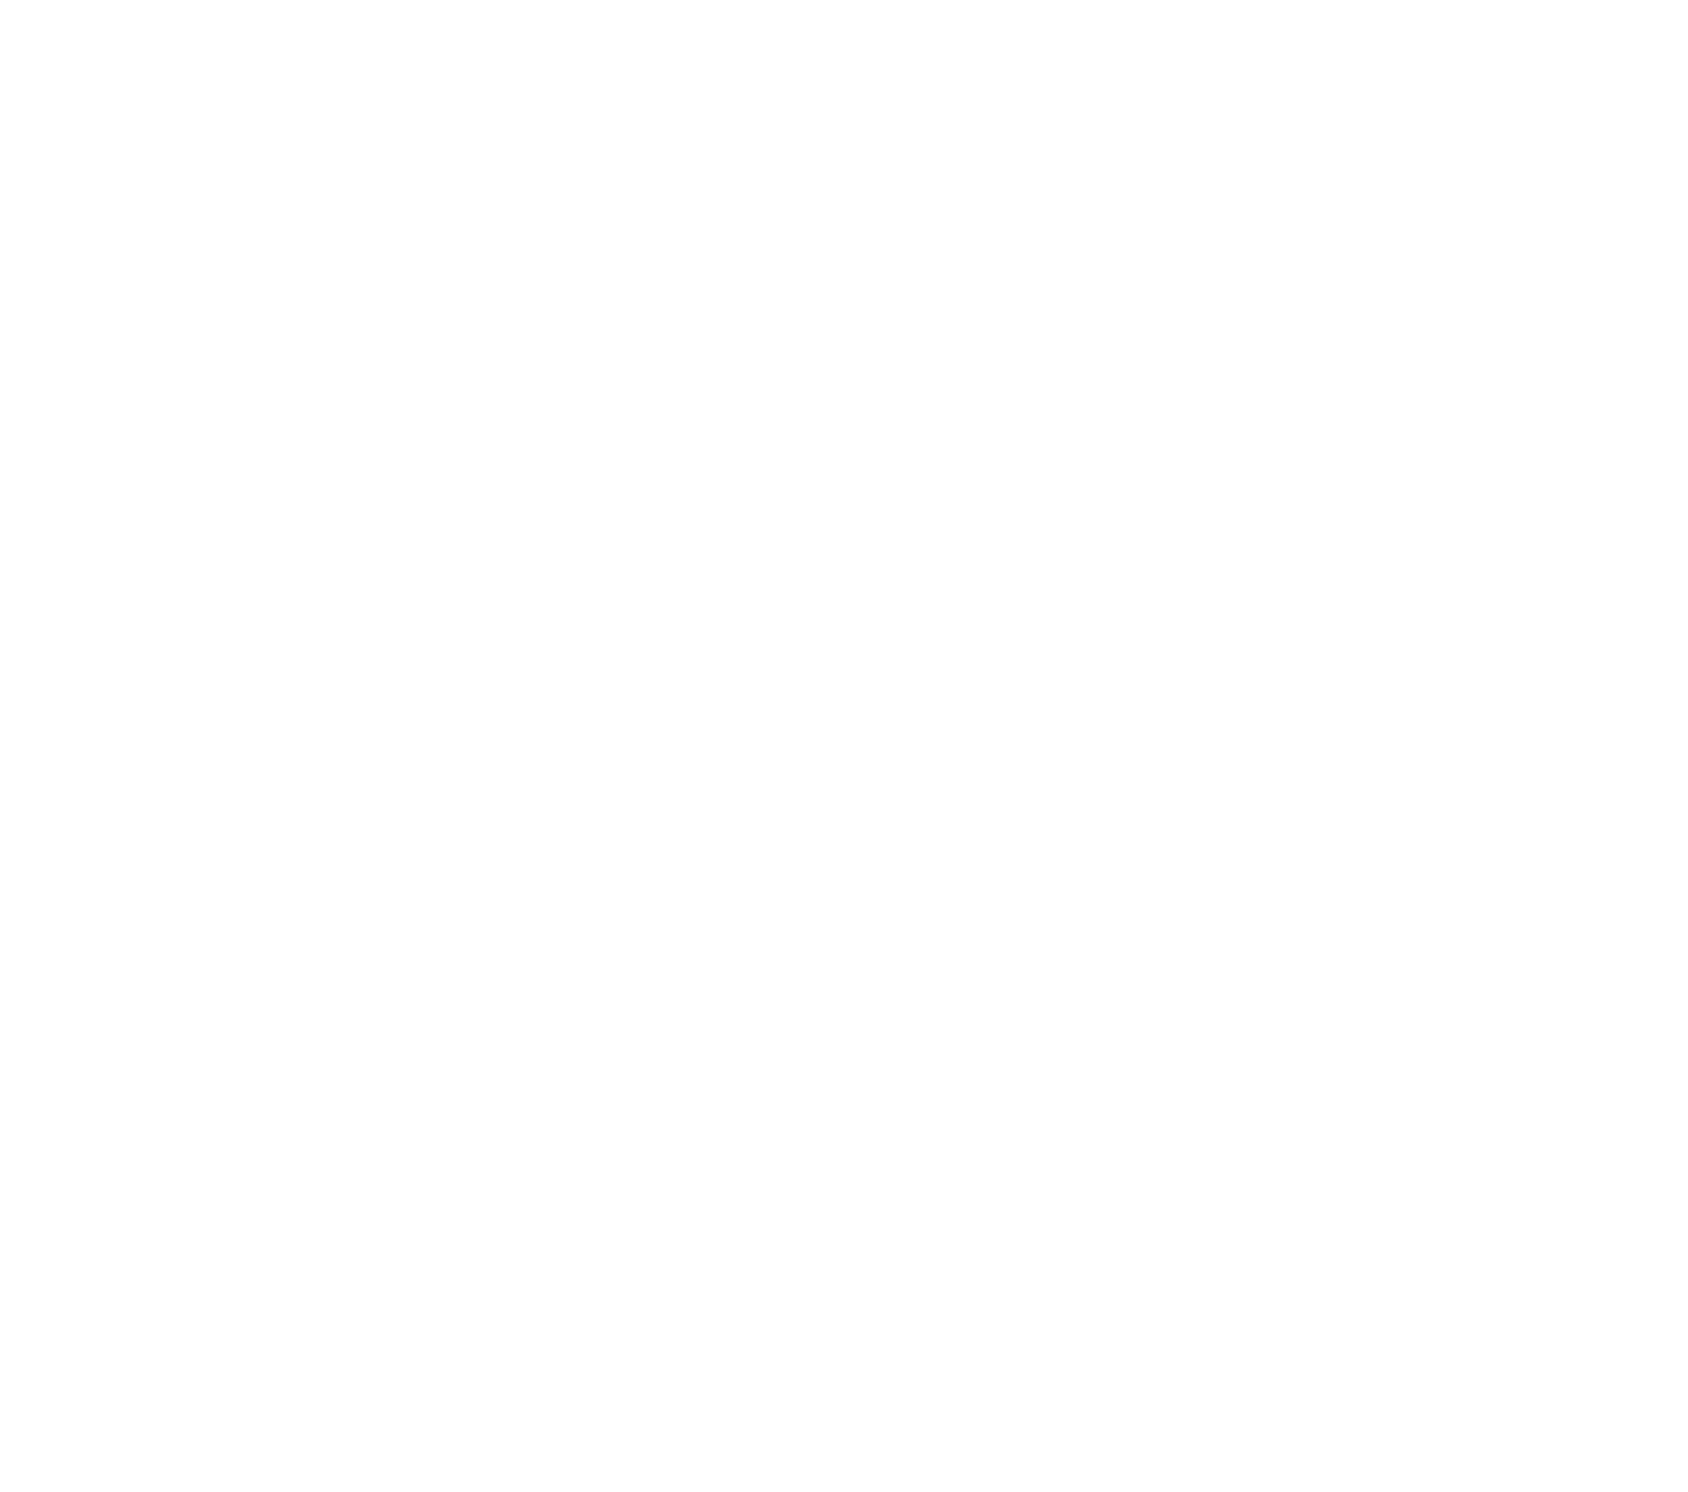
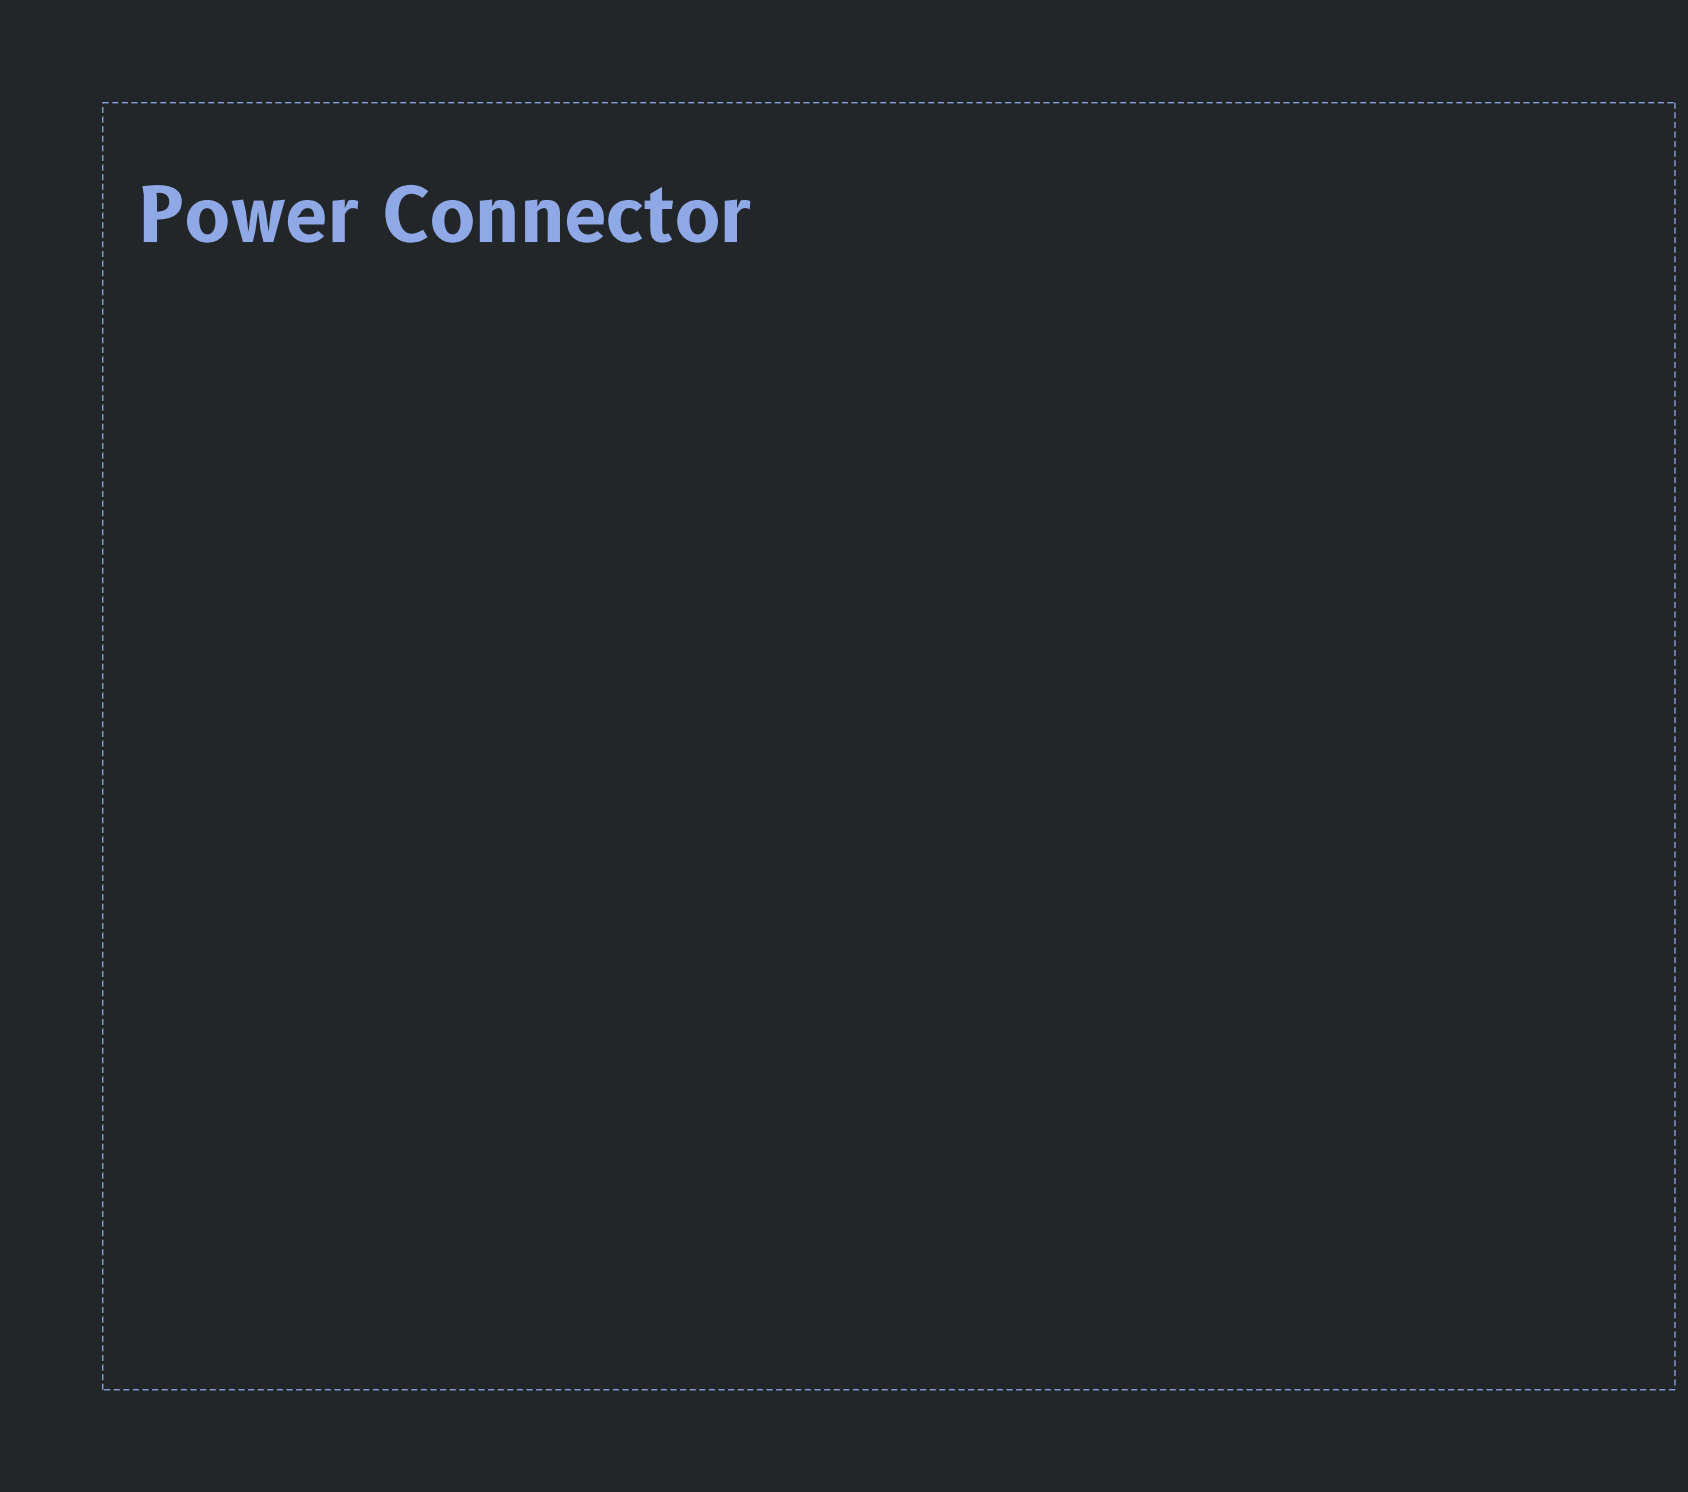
line: none -> (102, 102) (1674, 102) (1674, 1389) (102, 1389) (102, 102)
text: none -> Power Connector (446, 213)

